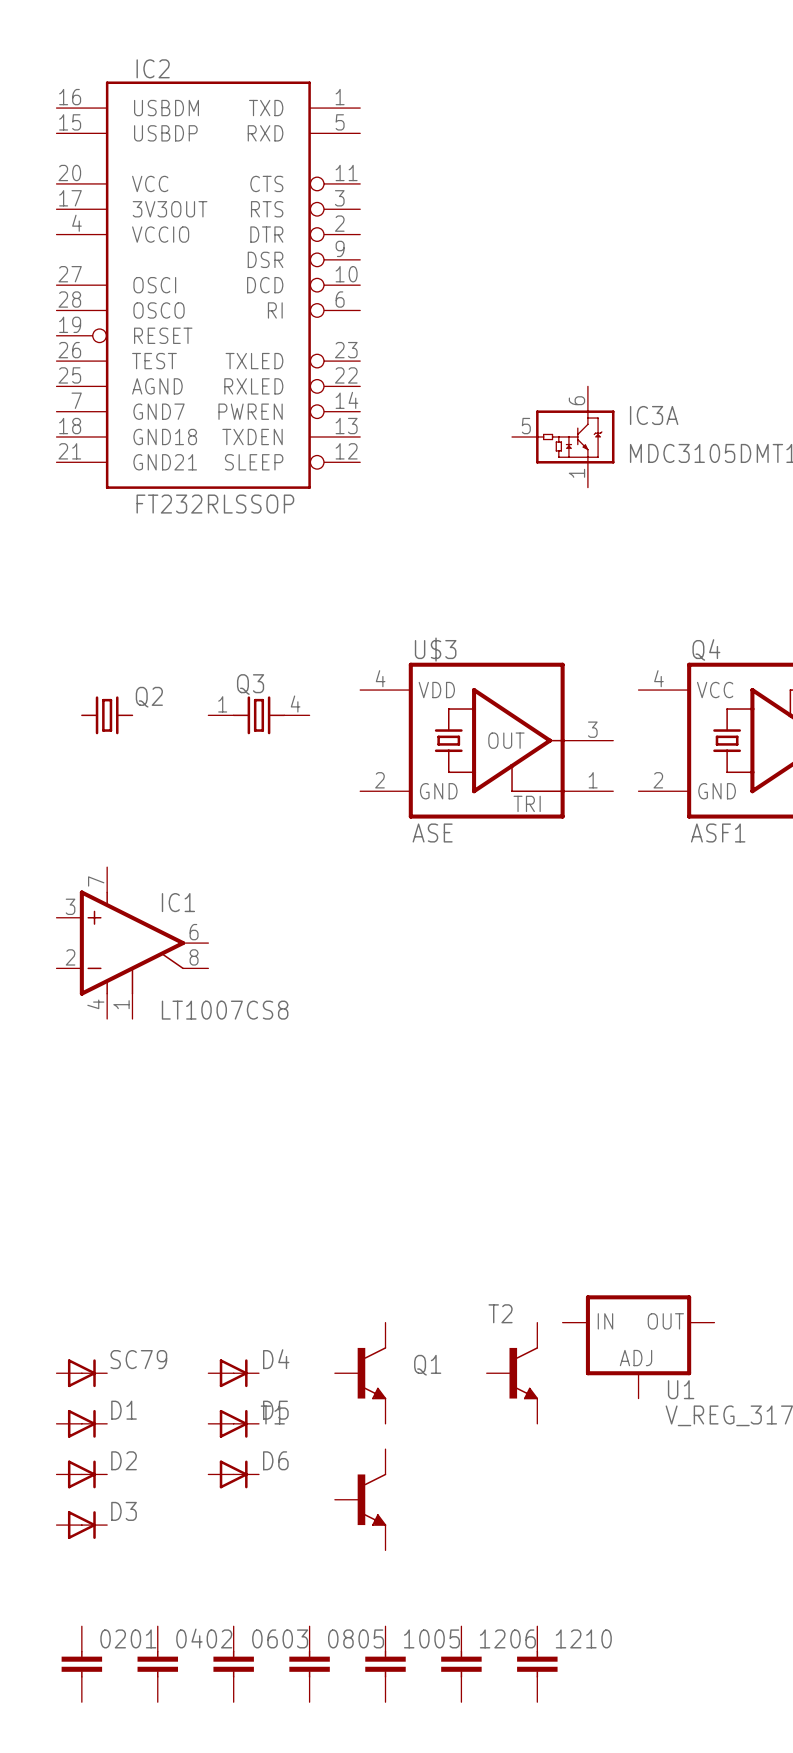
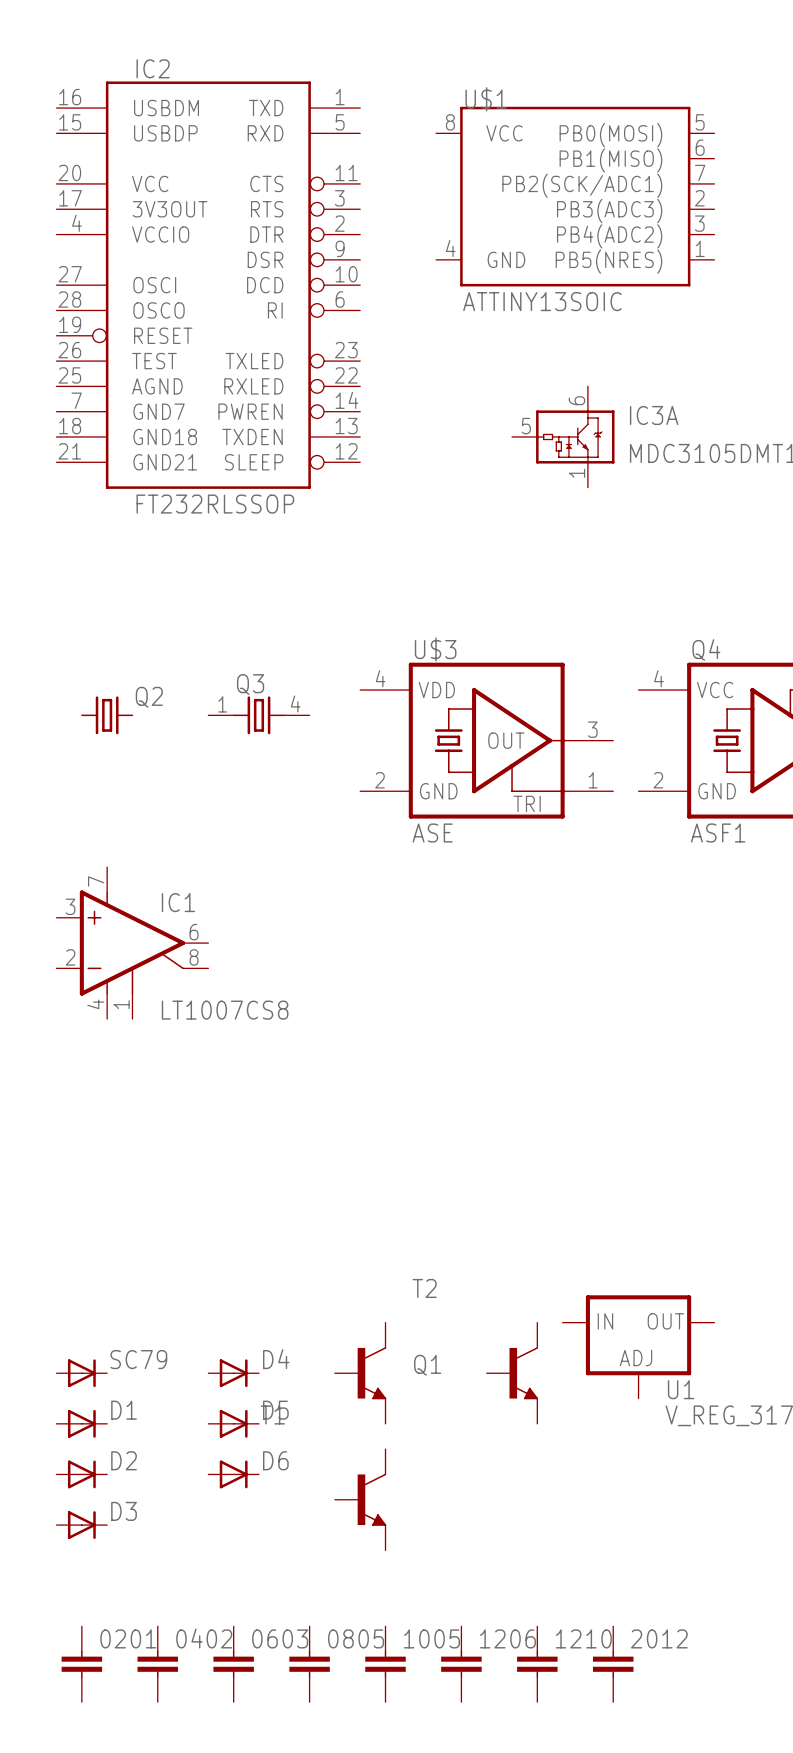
U$1: none -> ATTINY13SOIC (575, 196)
T2 name position: T2 (500, 1313) -> T2 (424, 1288)
2012: none -> (613, 1664)

